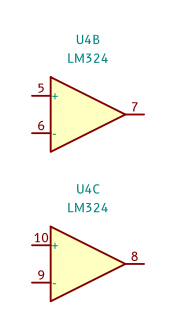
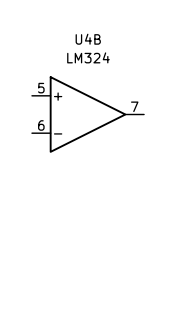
U4C: LM324 (88, 263) -> none

